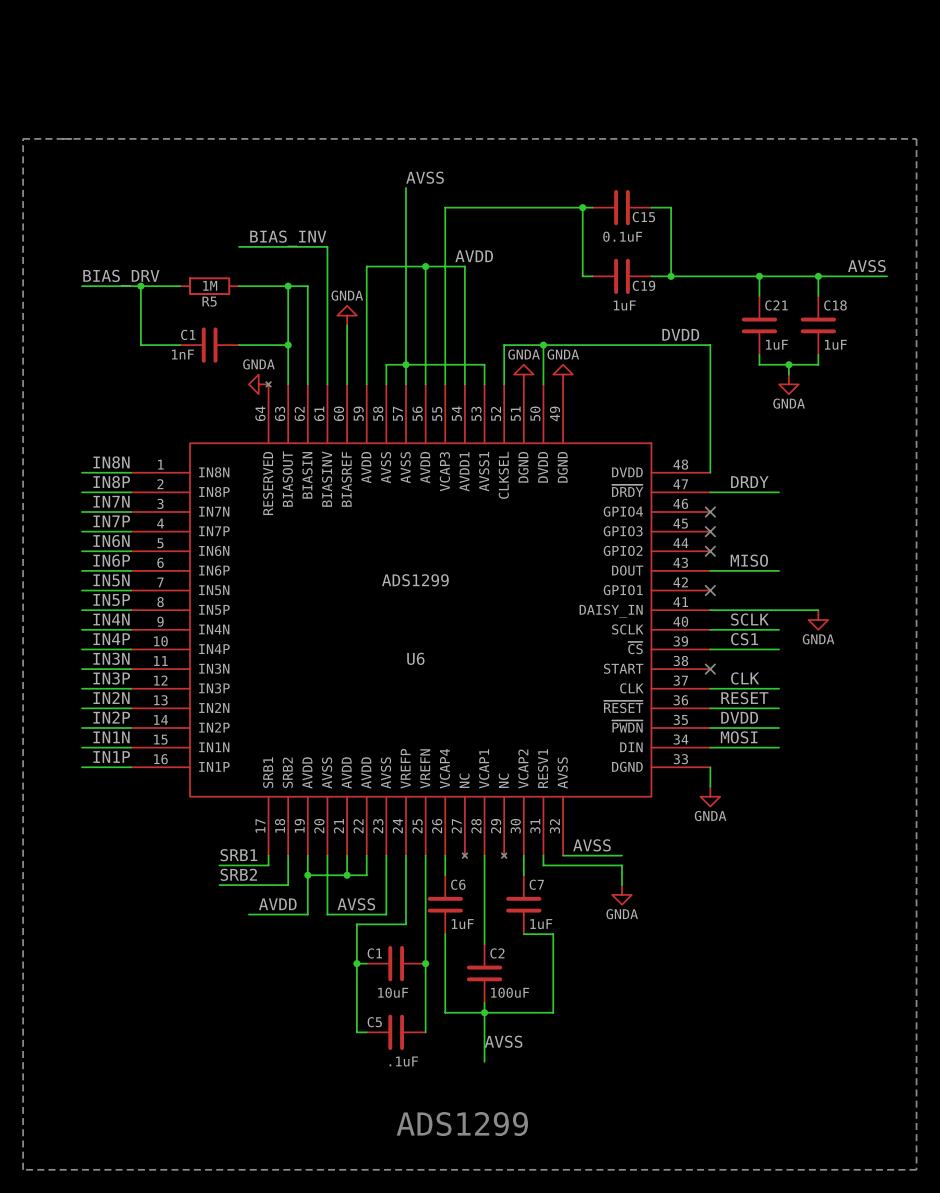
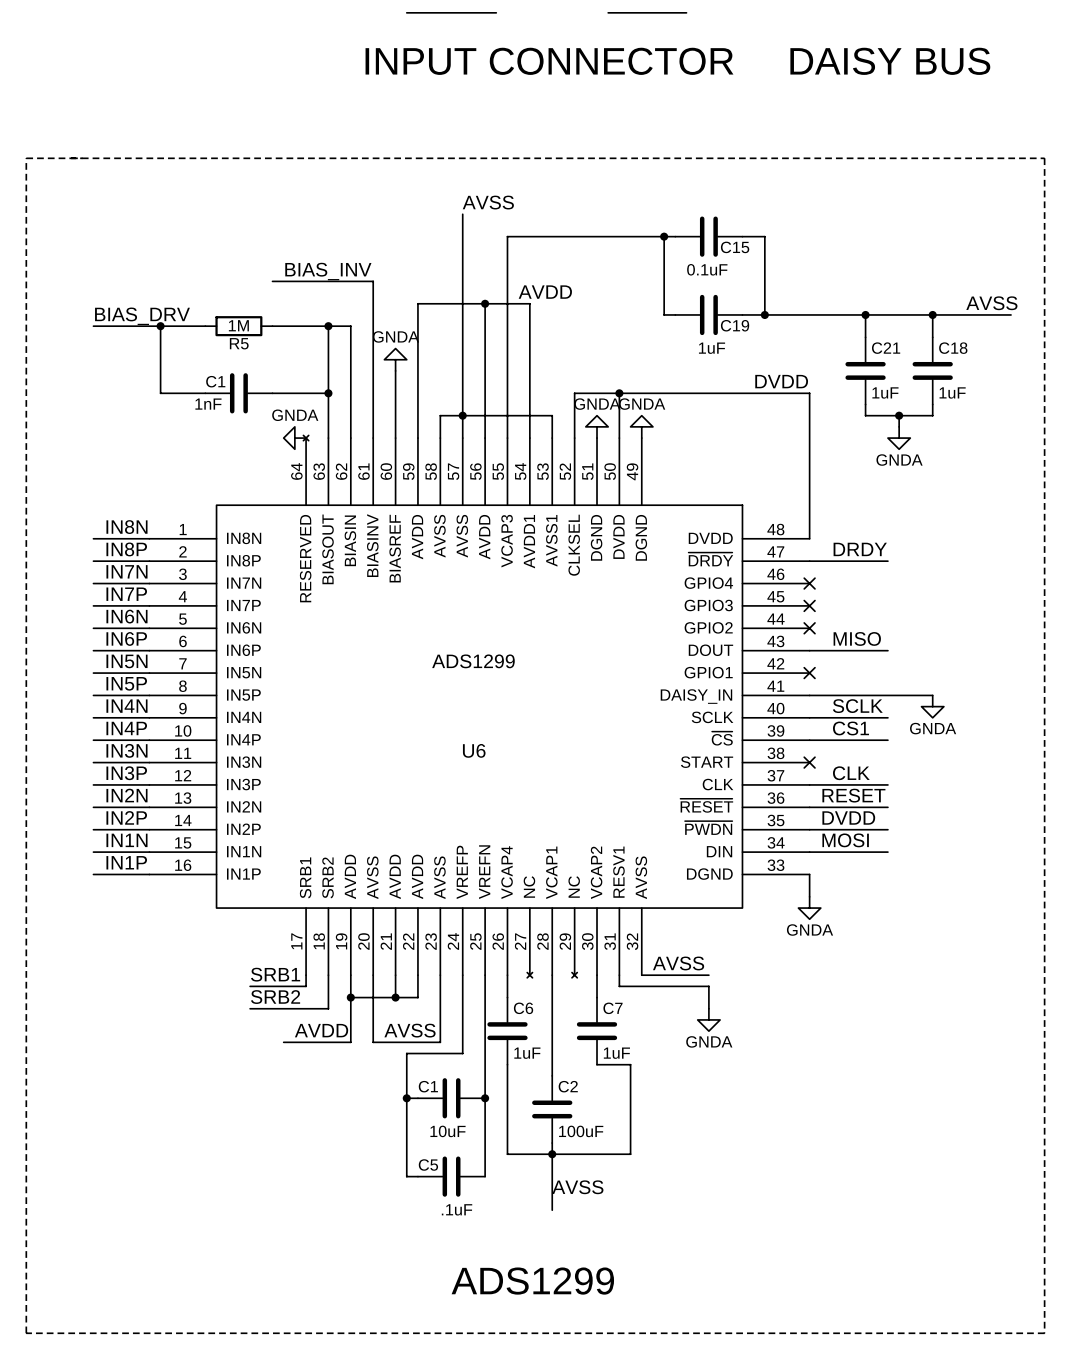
wire: none -> (406, 12) (496, 12)
wire: none -> (608, 12) (686, 12)
text: none -> INPUT CONNECTOR (549, 61)
text: none -> DAISY BUS (890, 61)

